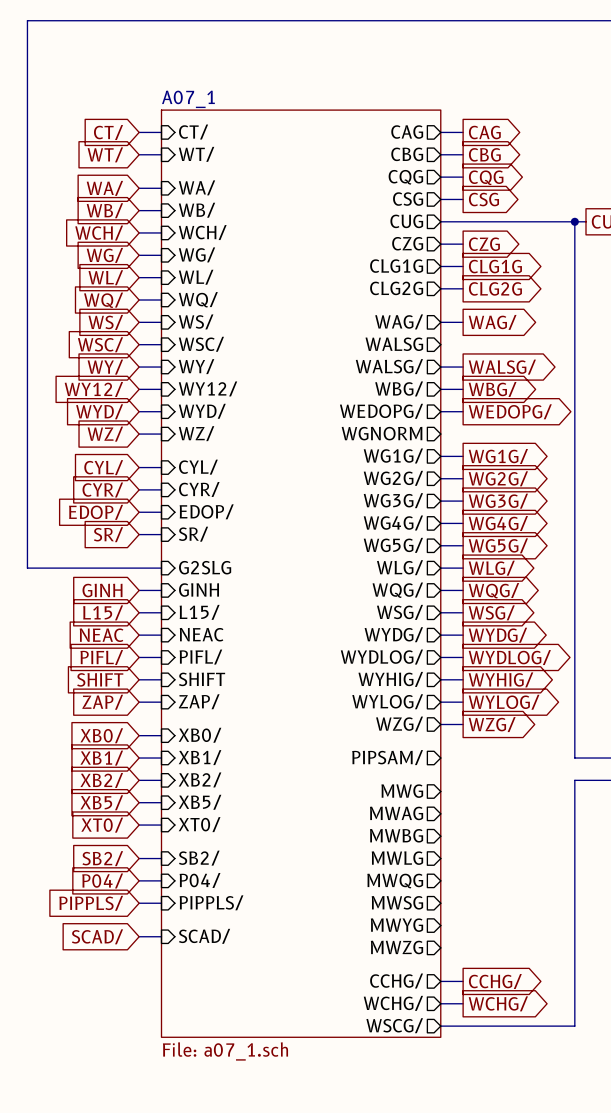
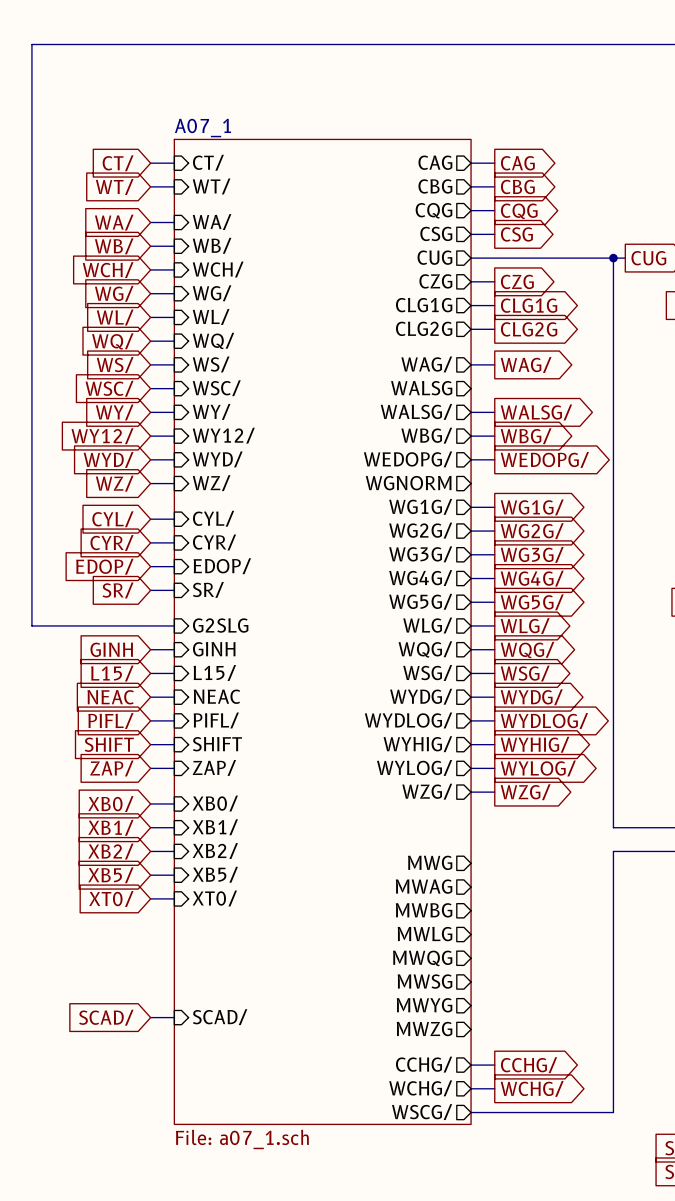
sheet pin: PIPSAM/ (387, 757) -> none
global label: SB2/ (102, 858) -> none
wire: (139, 858) (161, 858) -> none
sheet pin: SB2/ (199, 858) -> none
global label: P04/ (102, 880) -> none
wire: (139, 880) (161, 880) -> none
sheet pin: P04/ (200, 880) -> none
sheet pin: PIPPLS/ (211, 902) -> none
global label: PIPPLS/ (91, 903) -> none
wire: (139, 903) (161, 903) -> none

